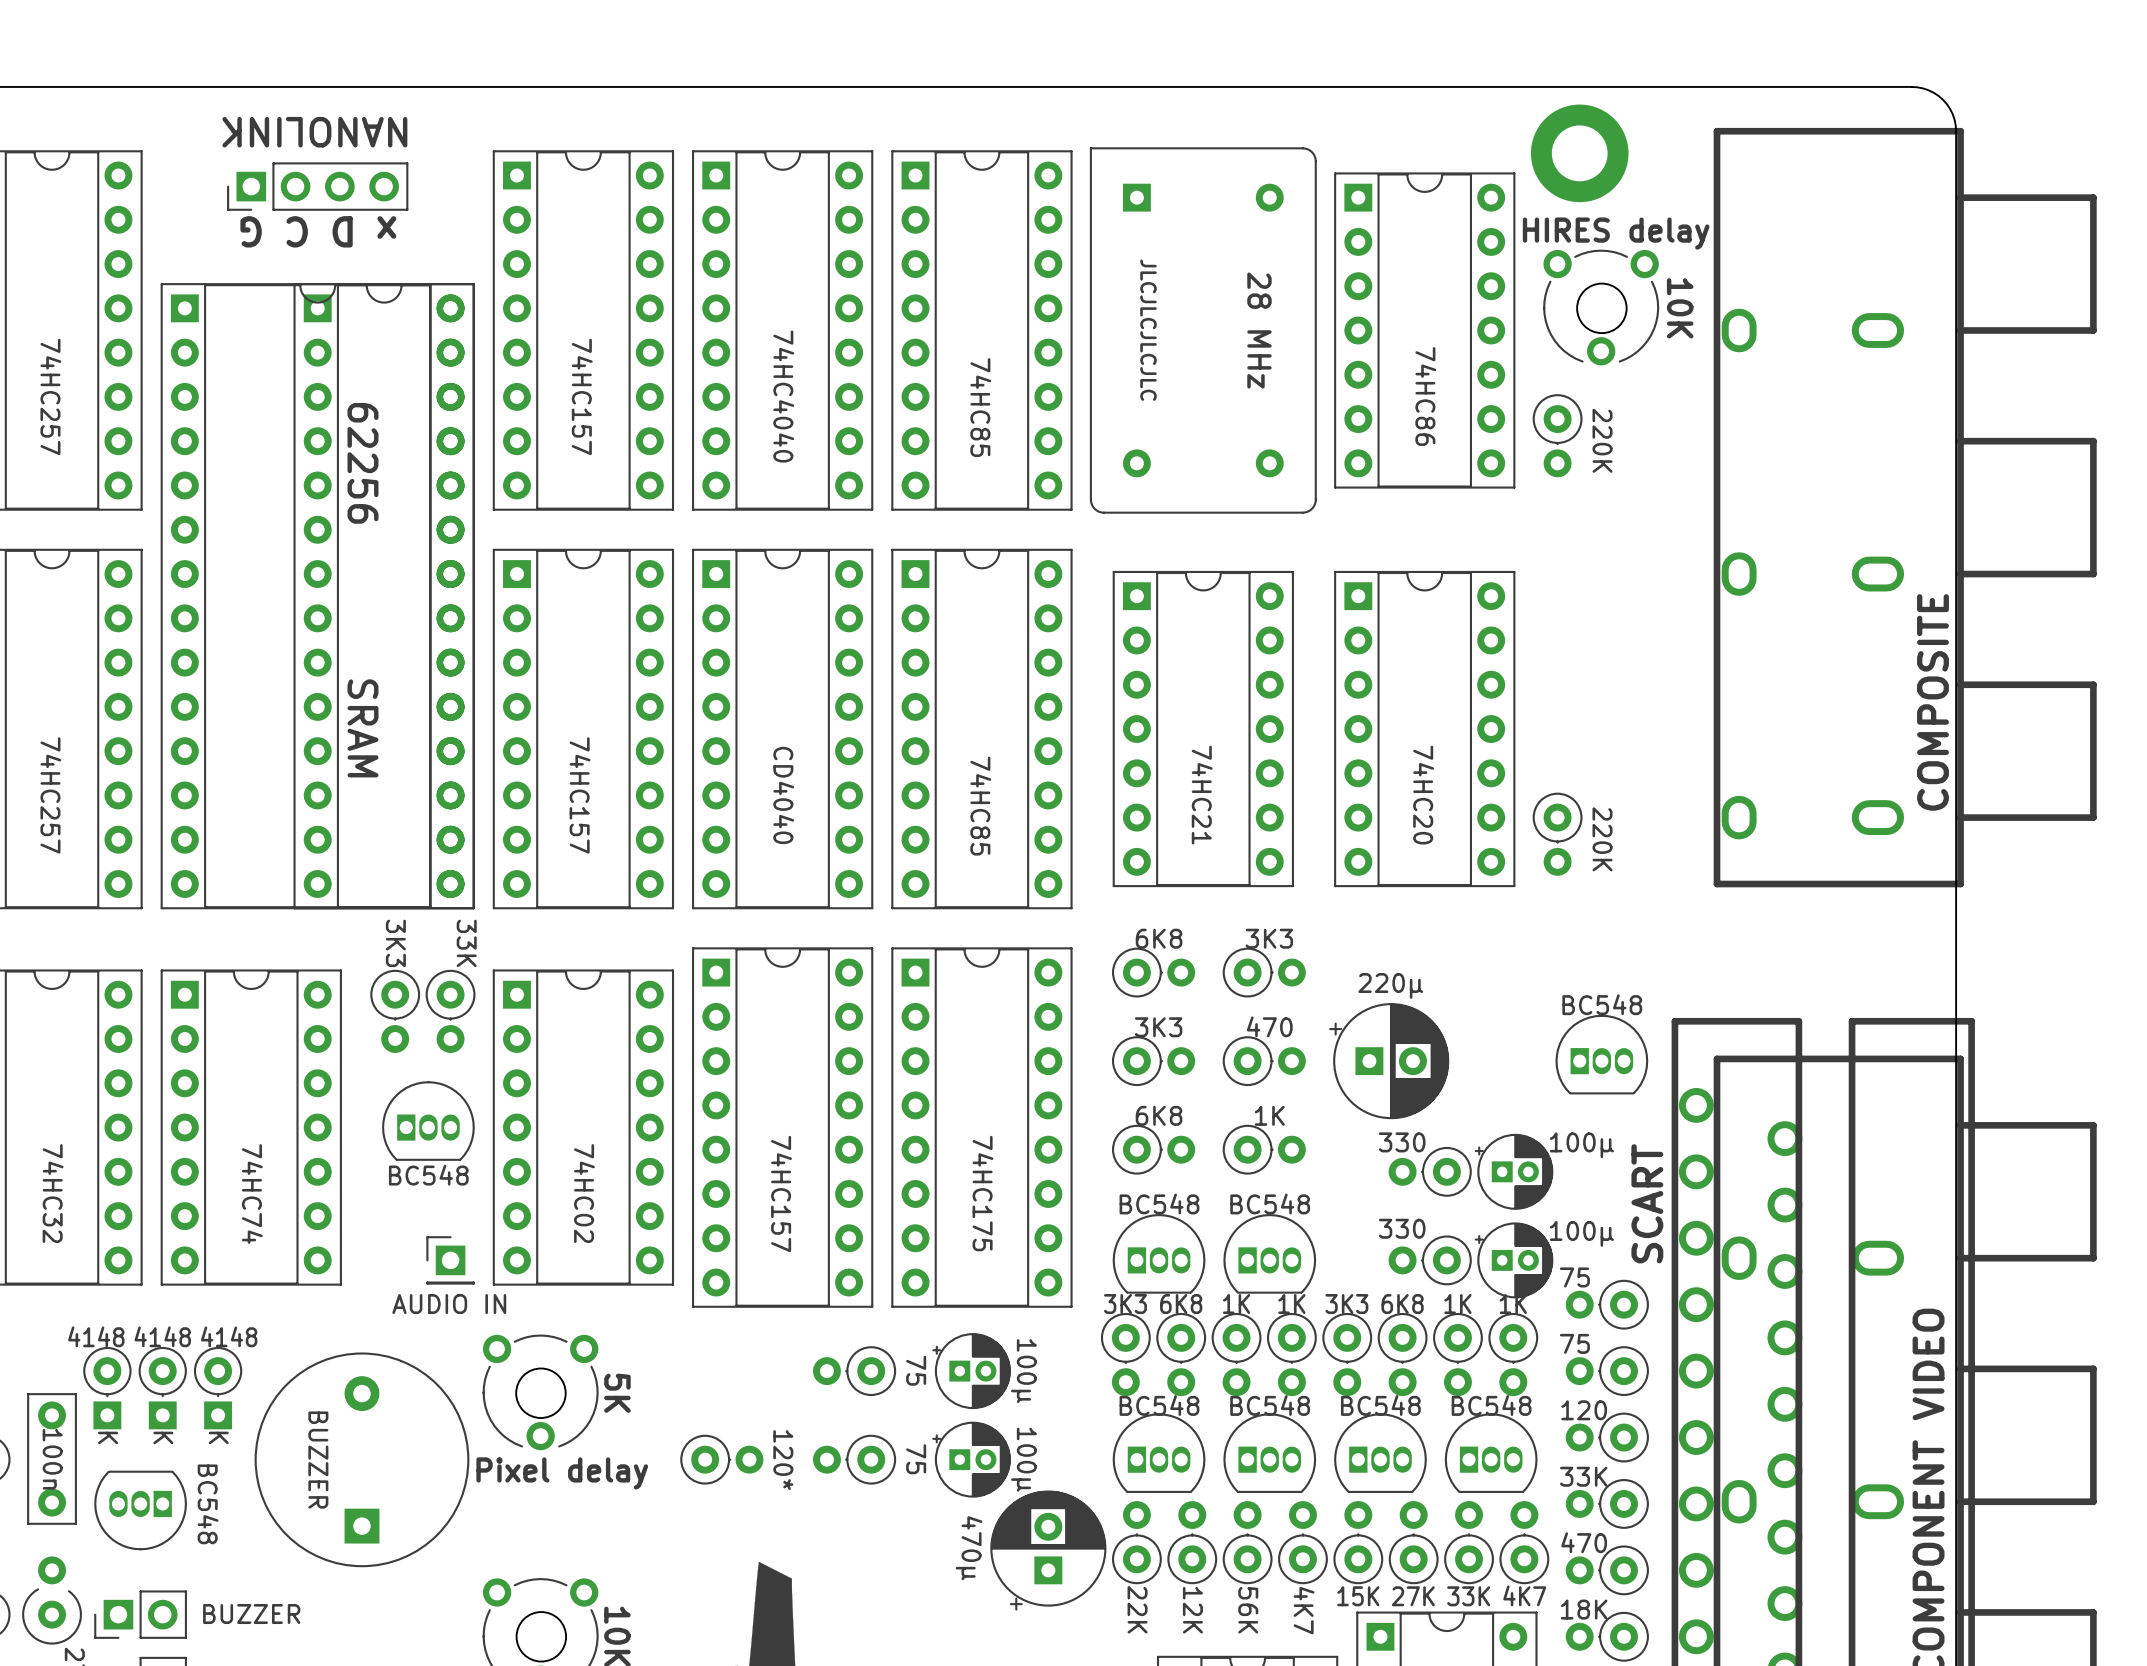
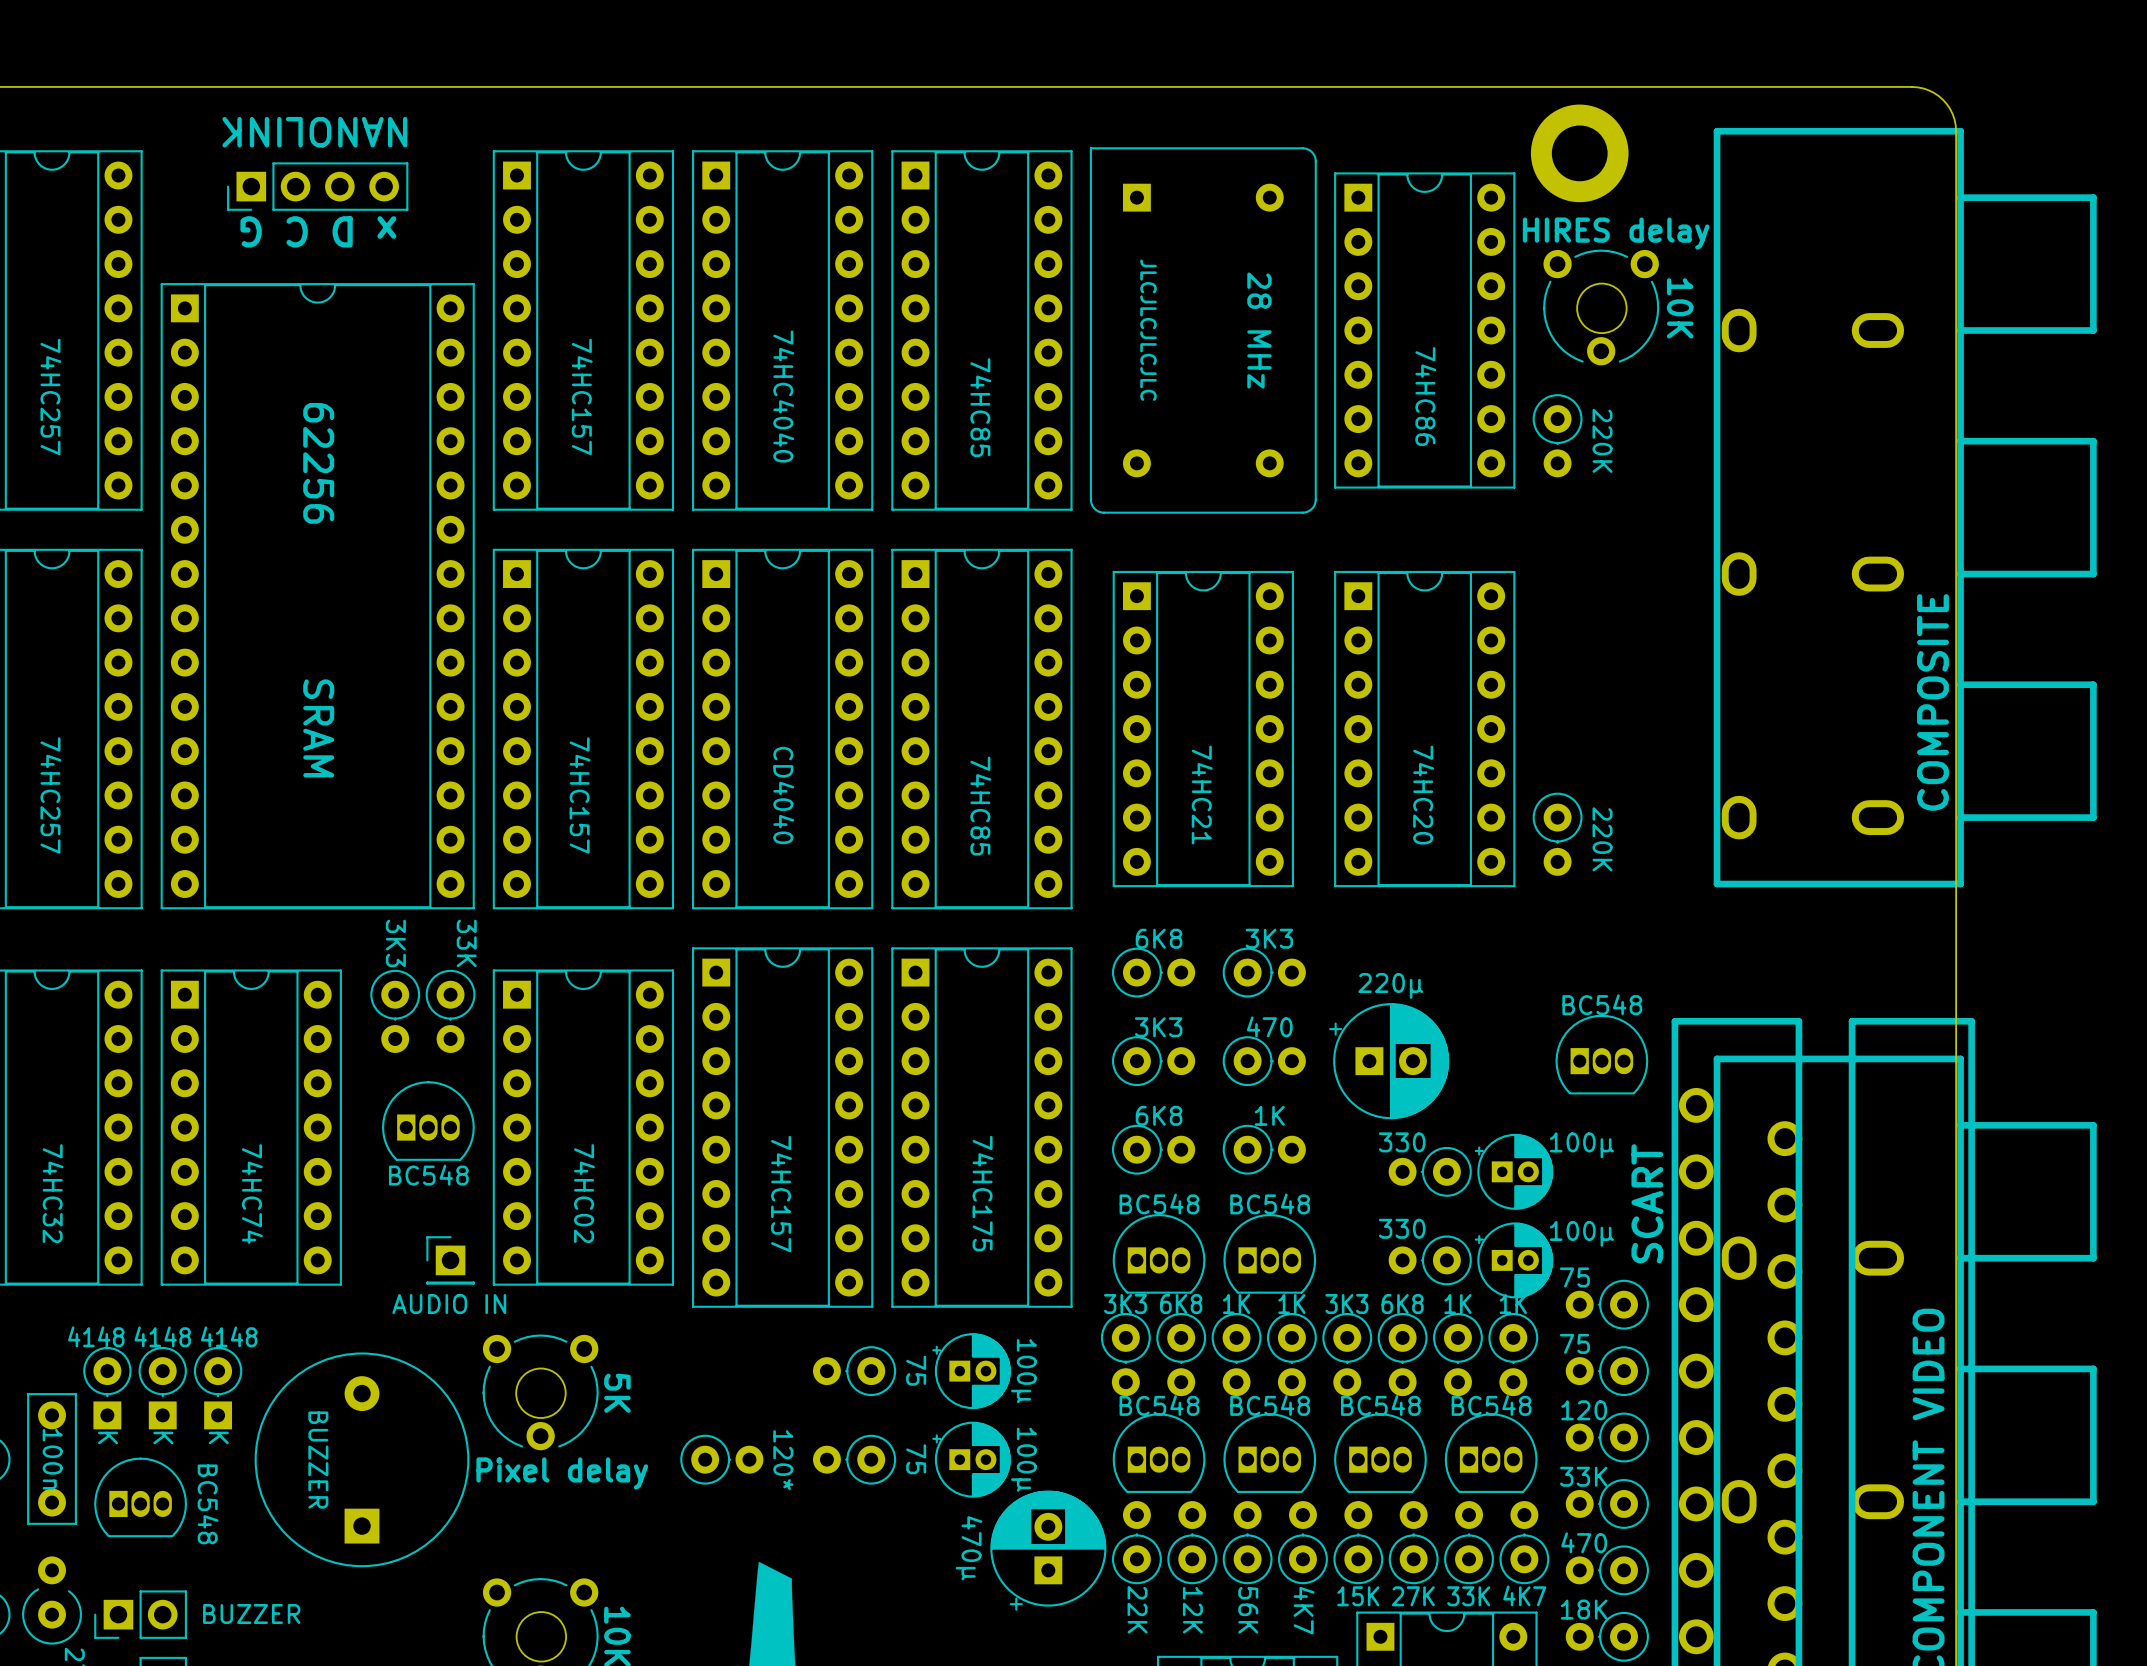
part value position: 62256 (362, 463) -> 62256 (318, 463)
part: (384, 596) -> none
text position: SRAM (362, 728) -> SRAM (318, 728)
part rotation: 0° (140, 1510) -> 180° (140, 1497)

